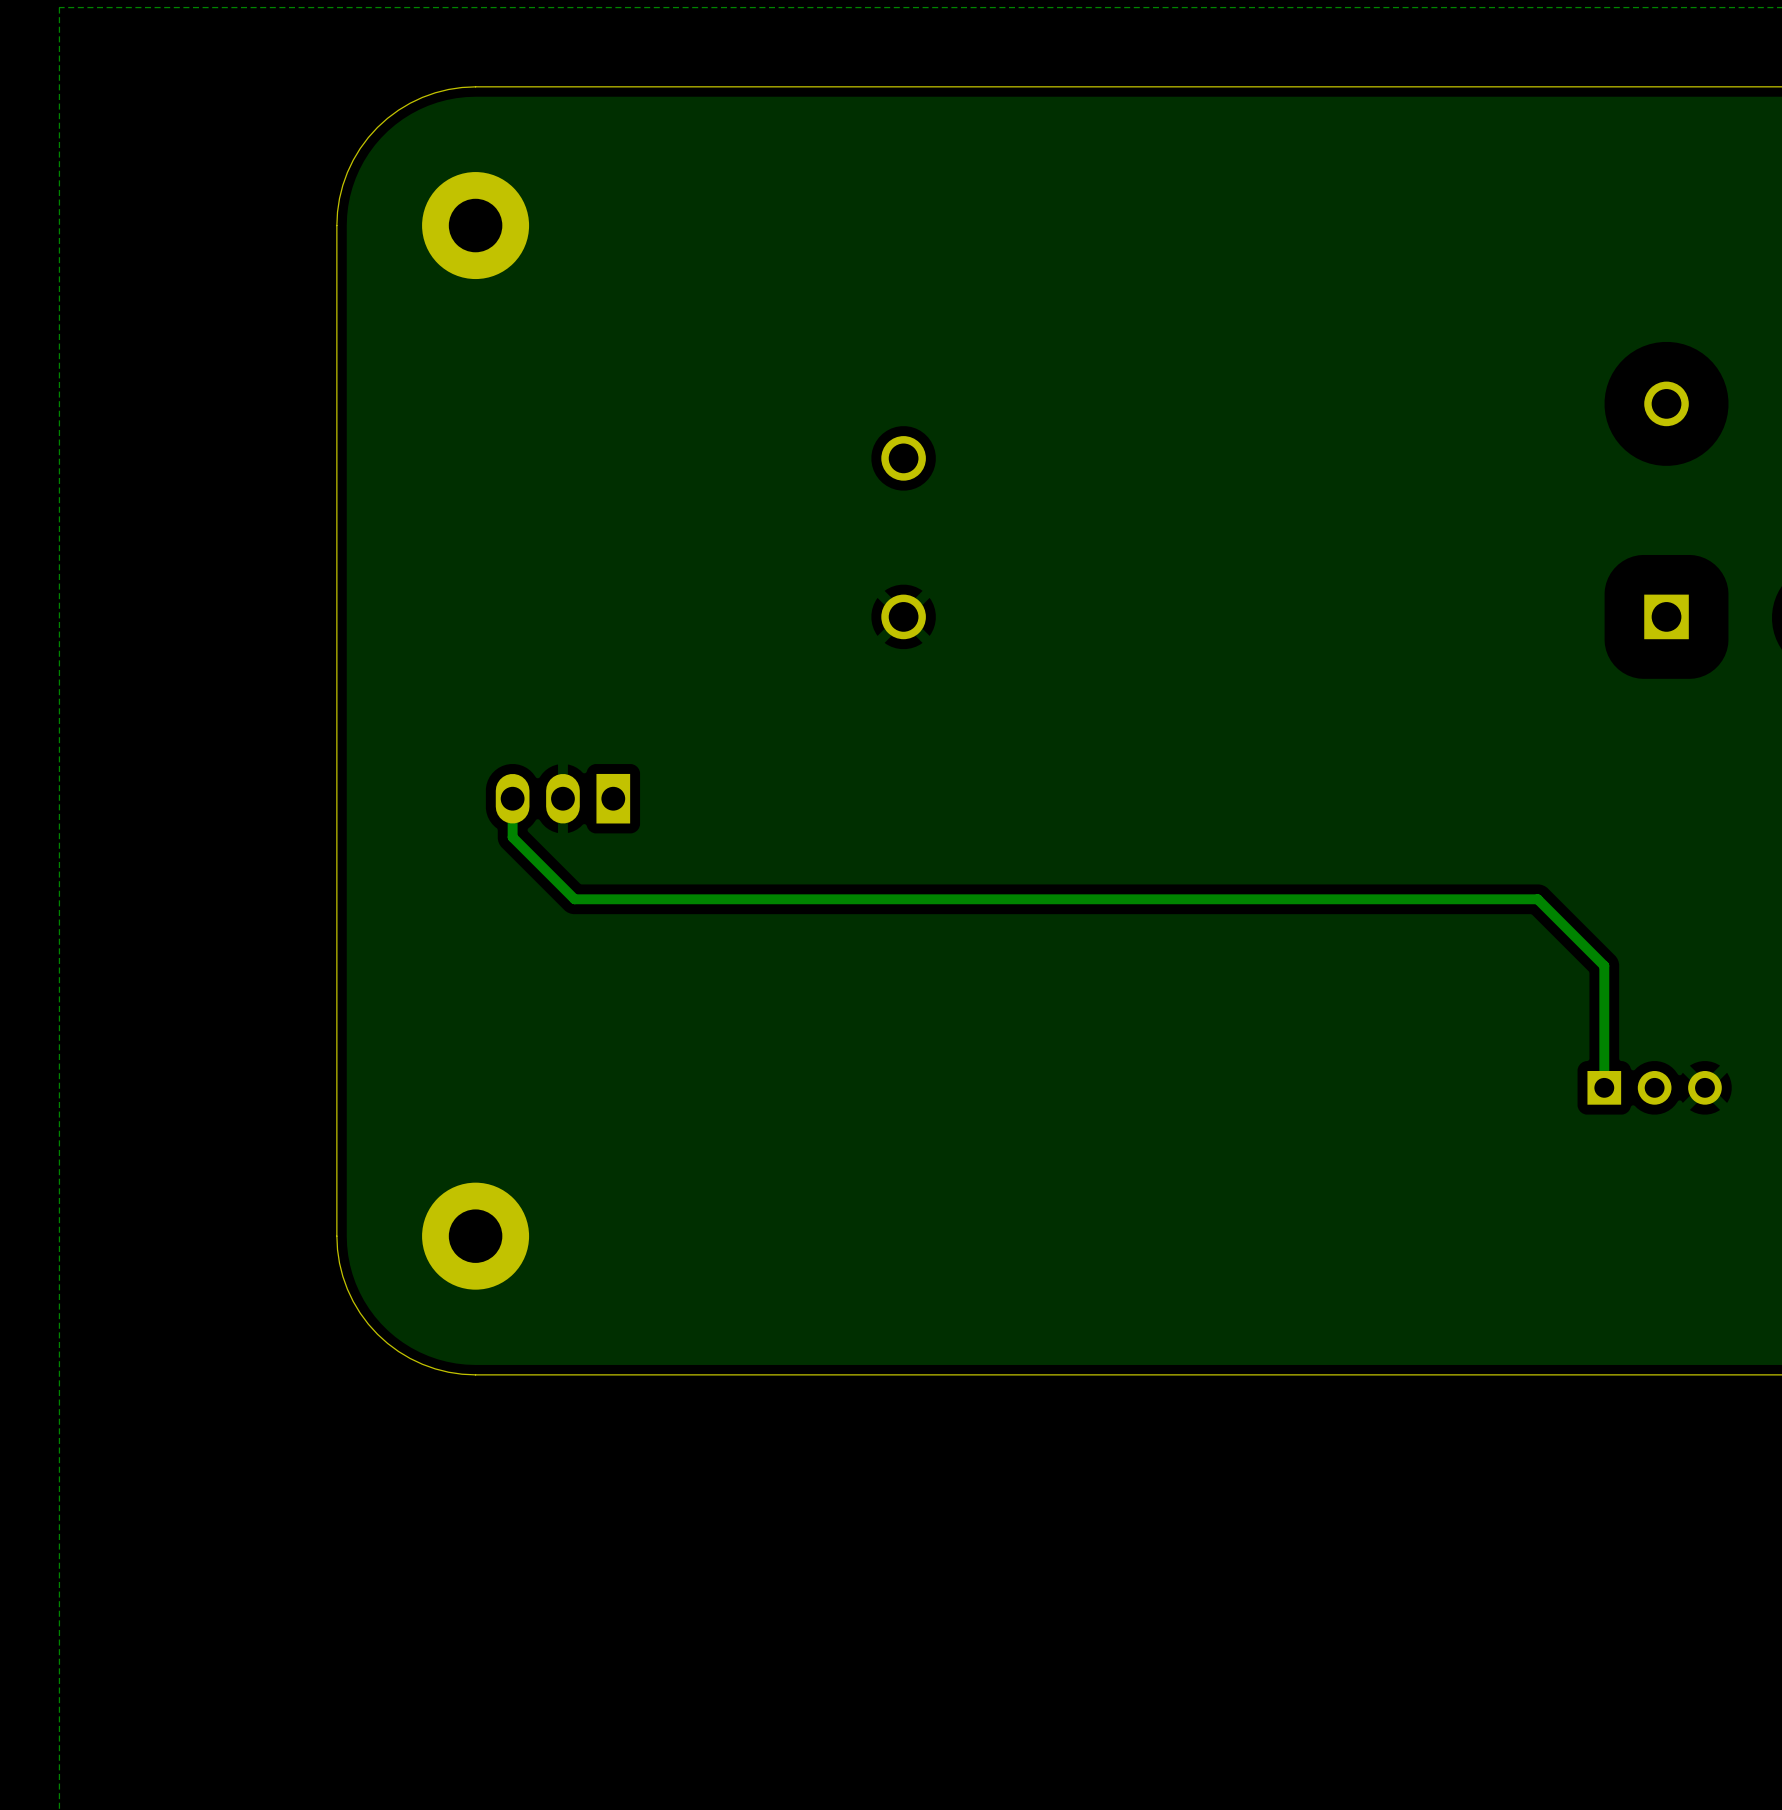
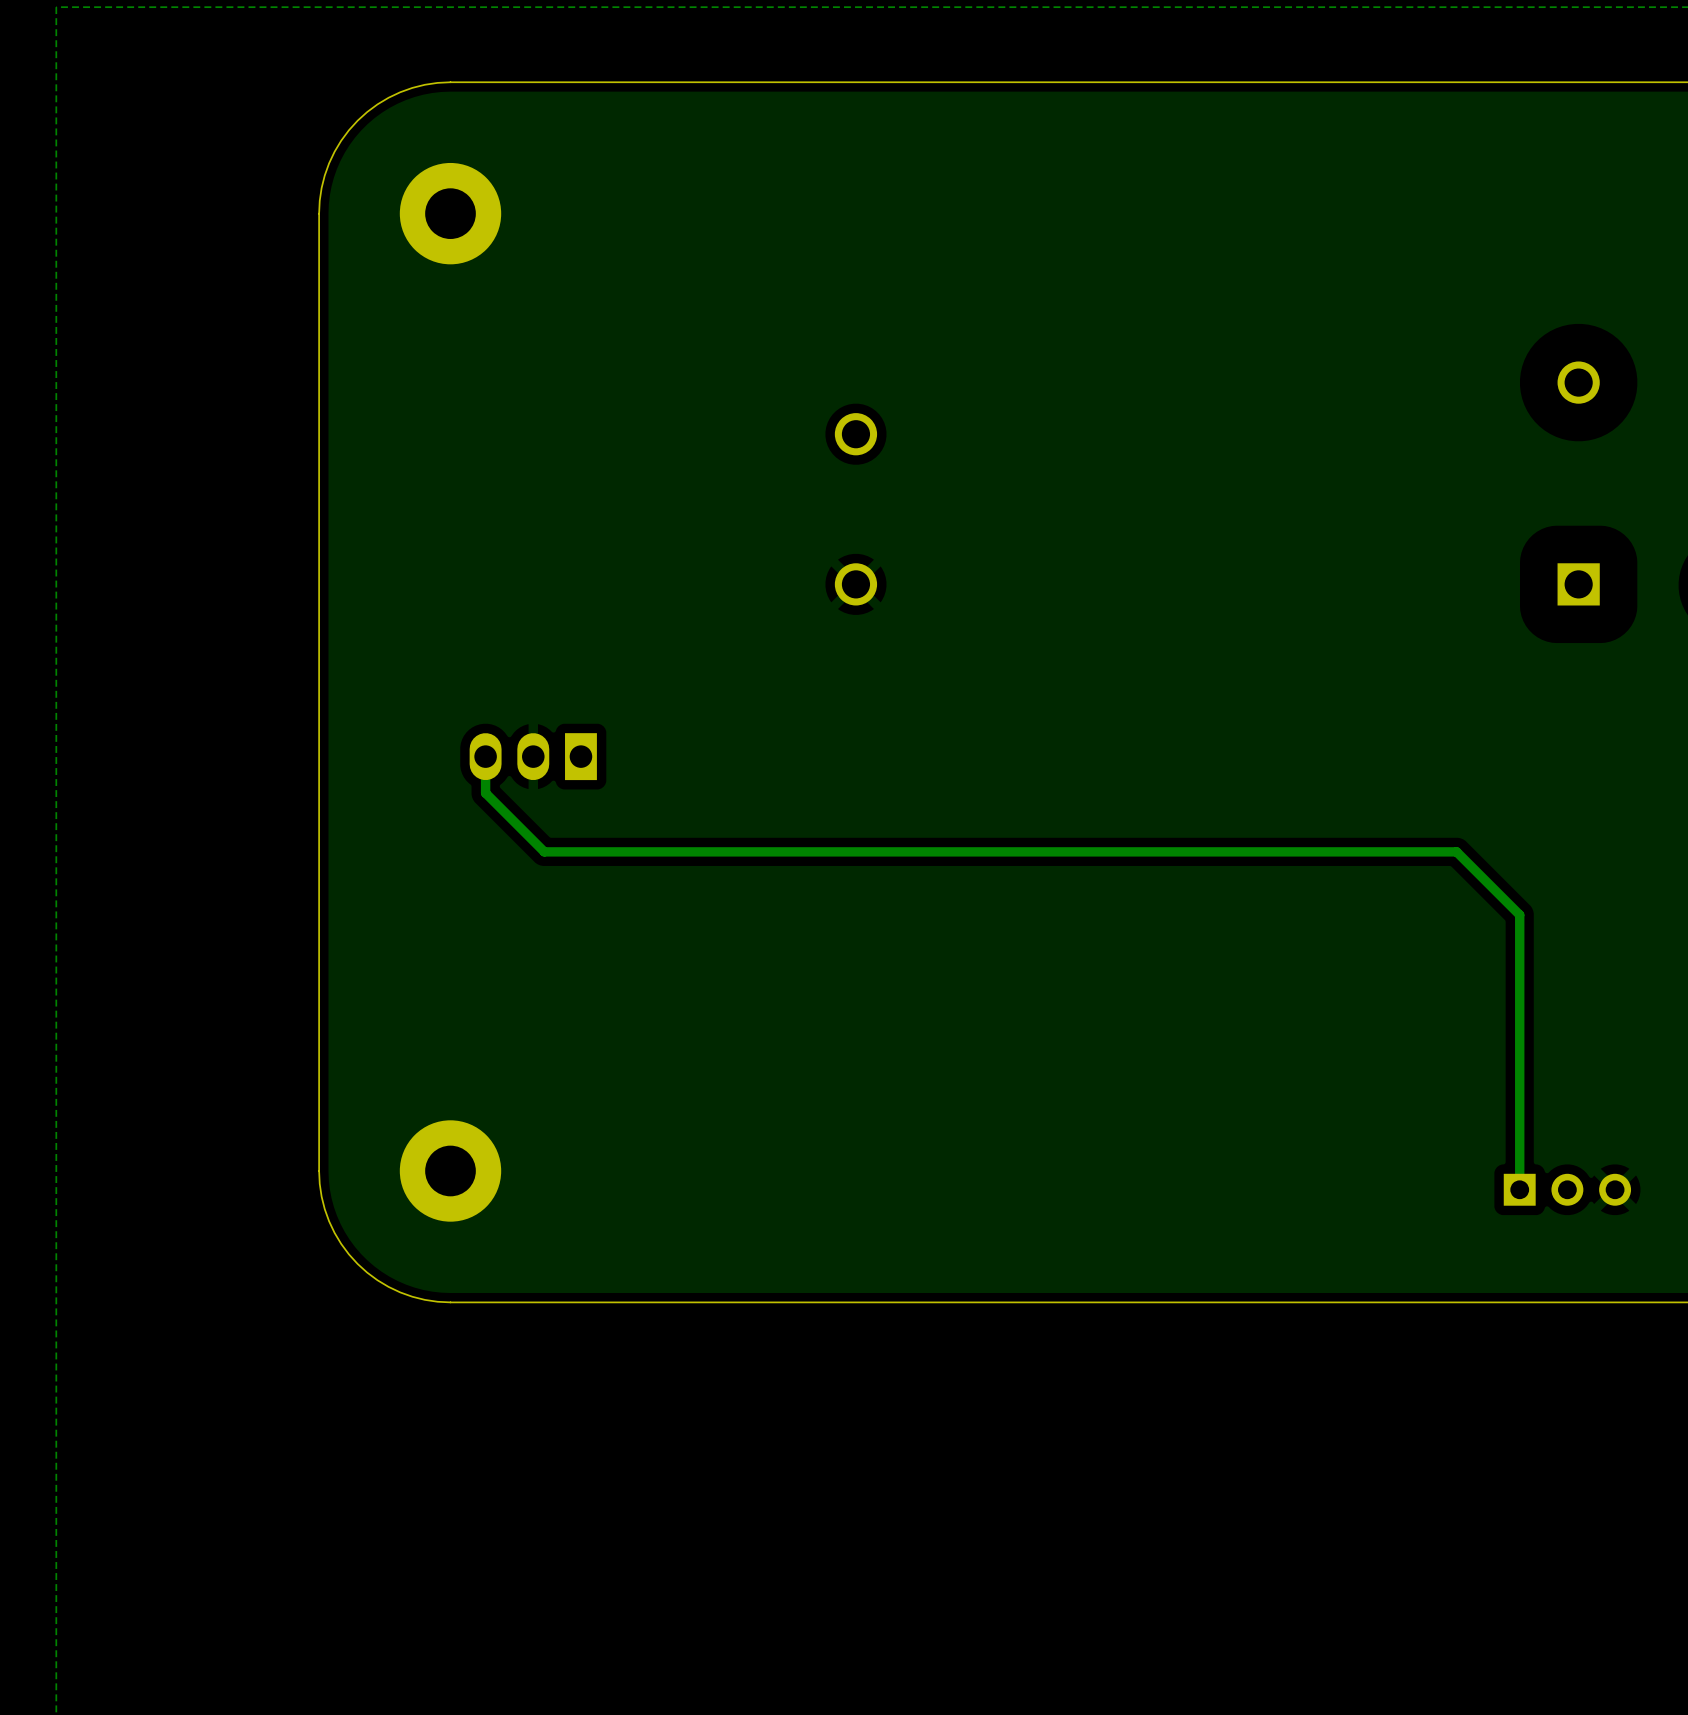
track: none -> (1519, 1030) (1519, 1189)
part position: (1654, 1087) -> (1567, 1189)

